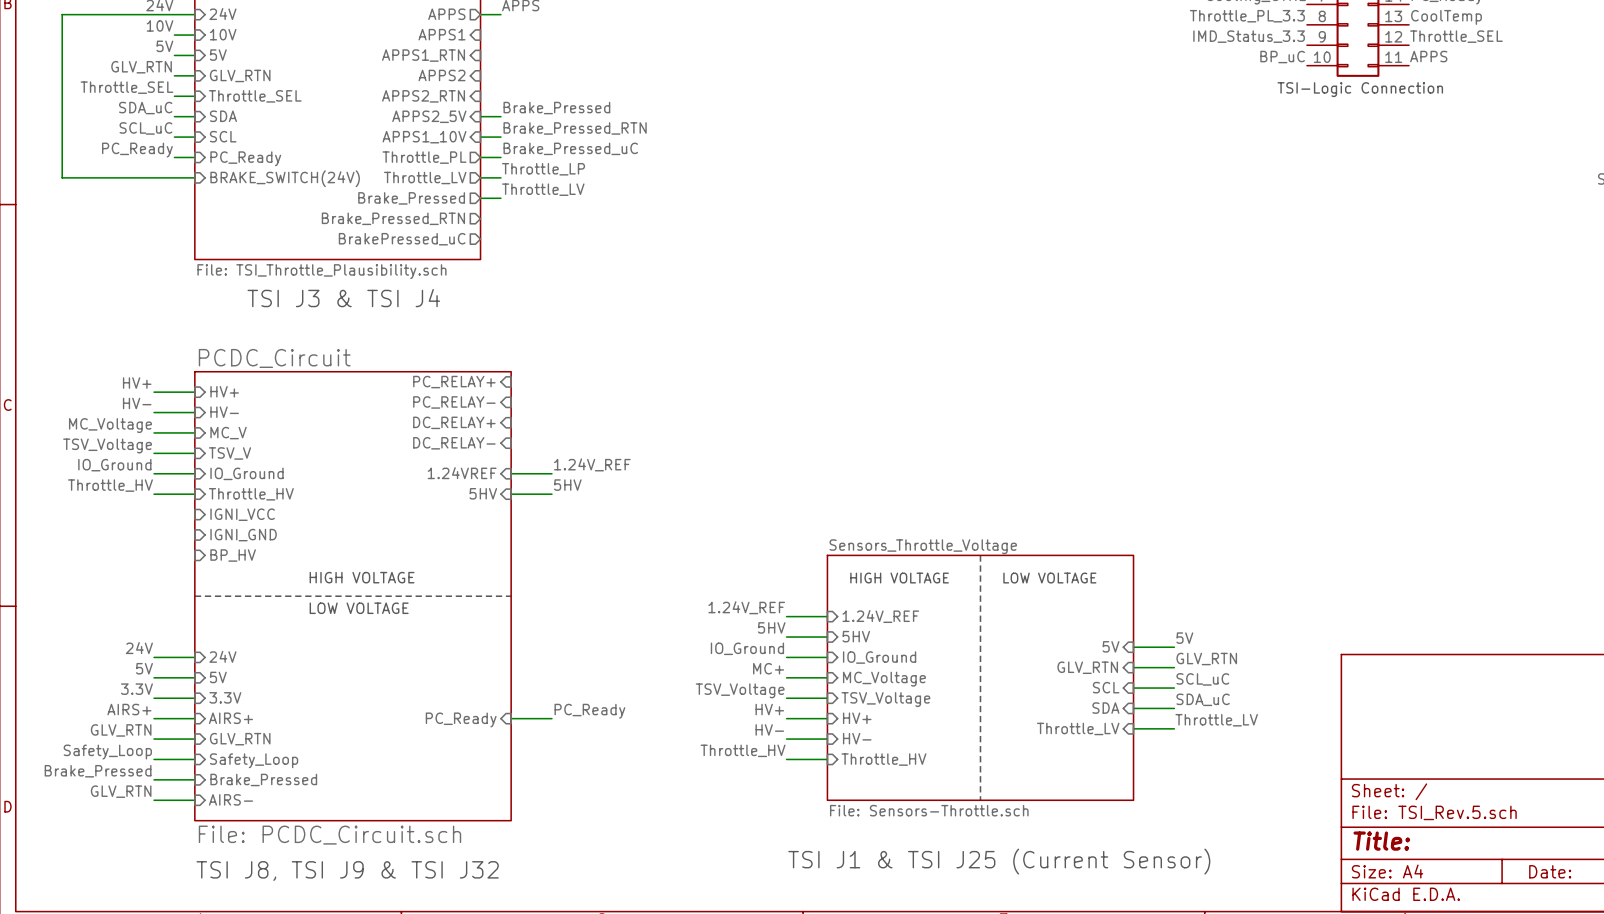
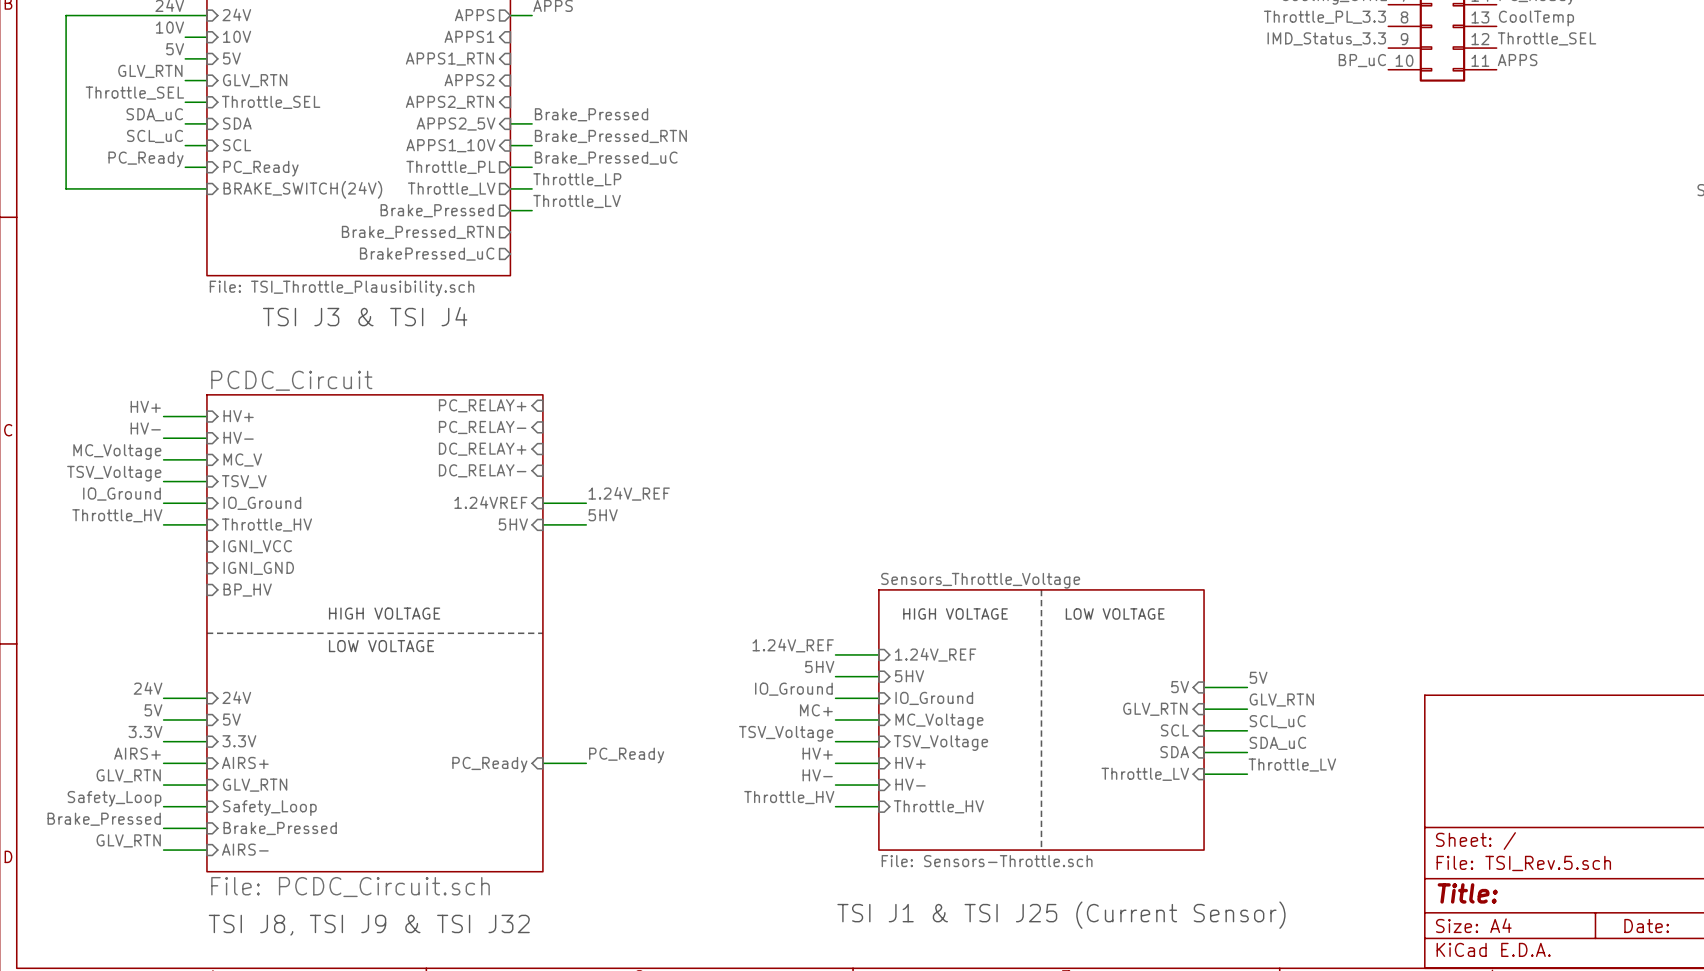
text: TSI-Logic Connection (1360, 89) -> none

